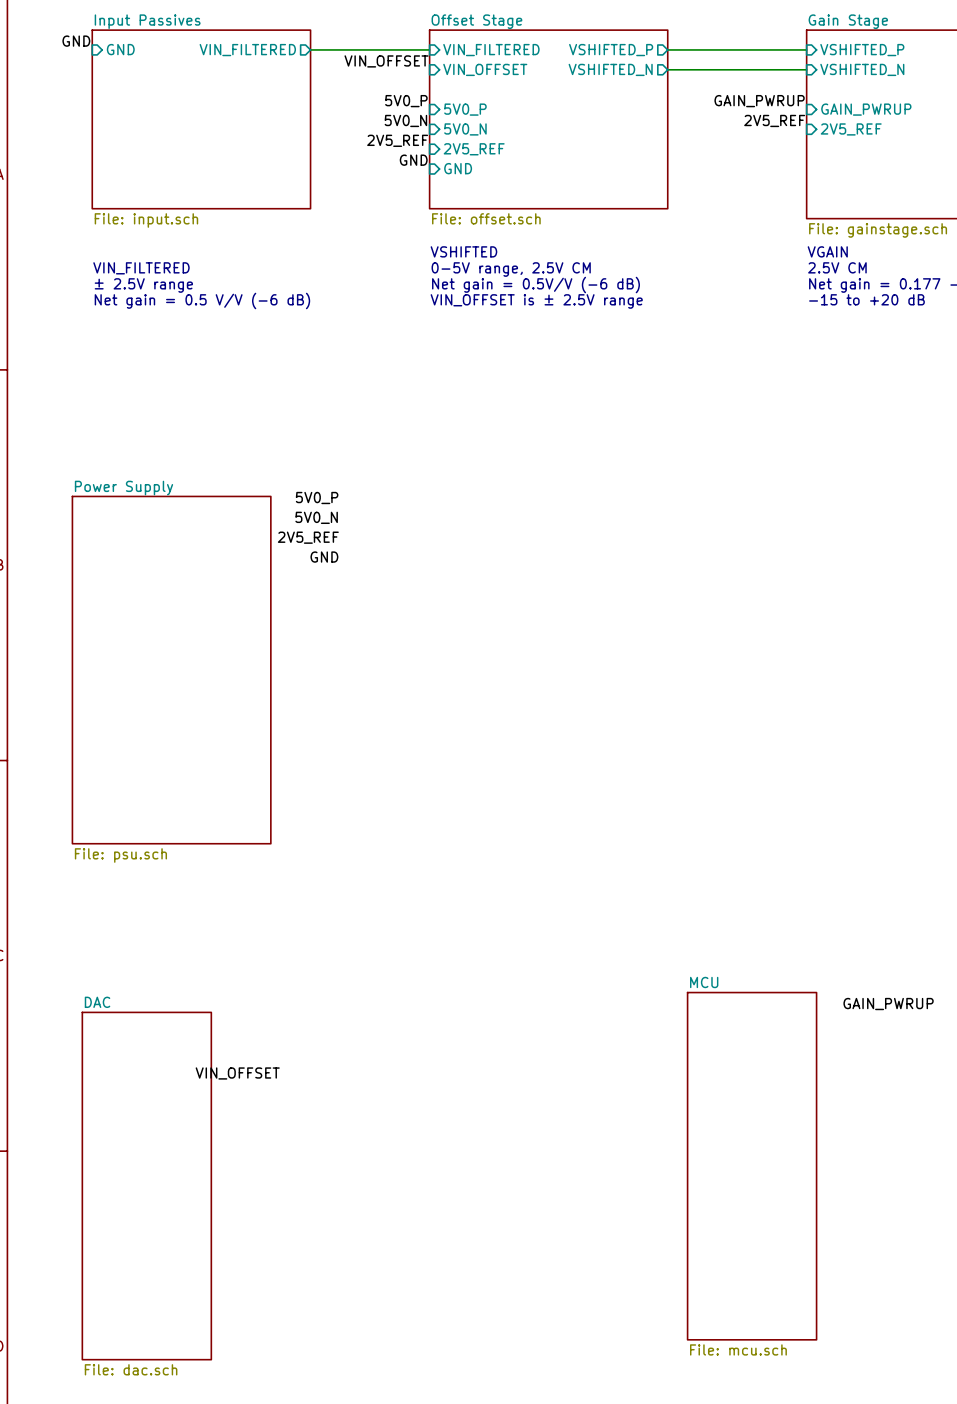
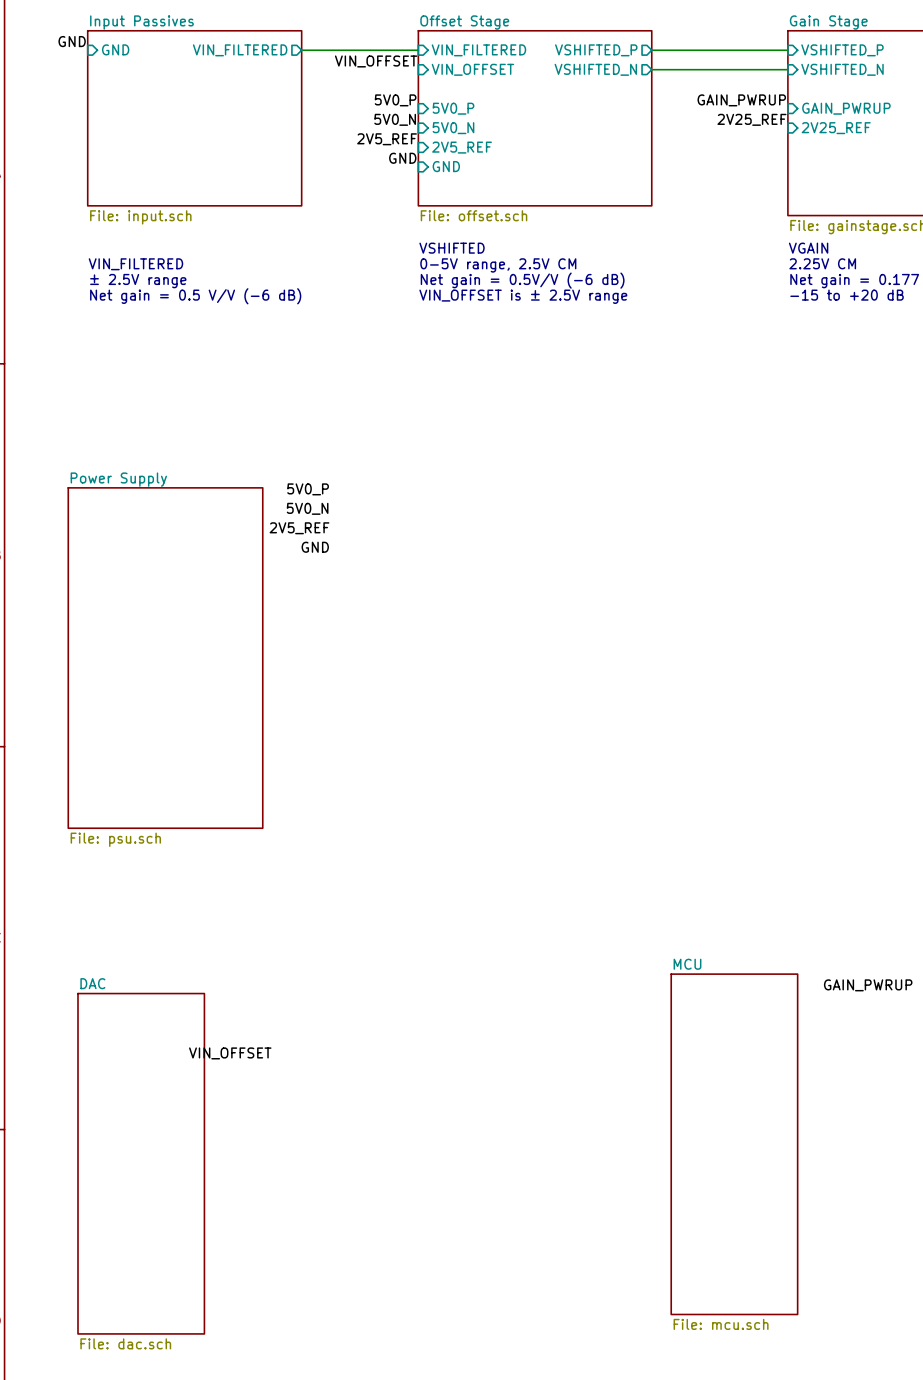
label: 2V5_REF (774, 120) -> 2V25_REF (751, 119)
sheet pin: 2V5_REF (851, 129) -> 2V25_REF (836, 128)
text: 2.5V CM (837, 267) -> 2.25V CM (822, 263)

